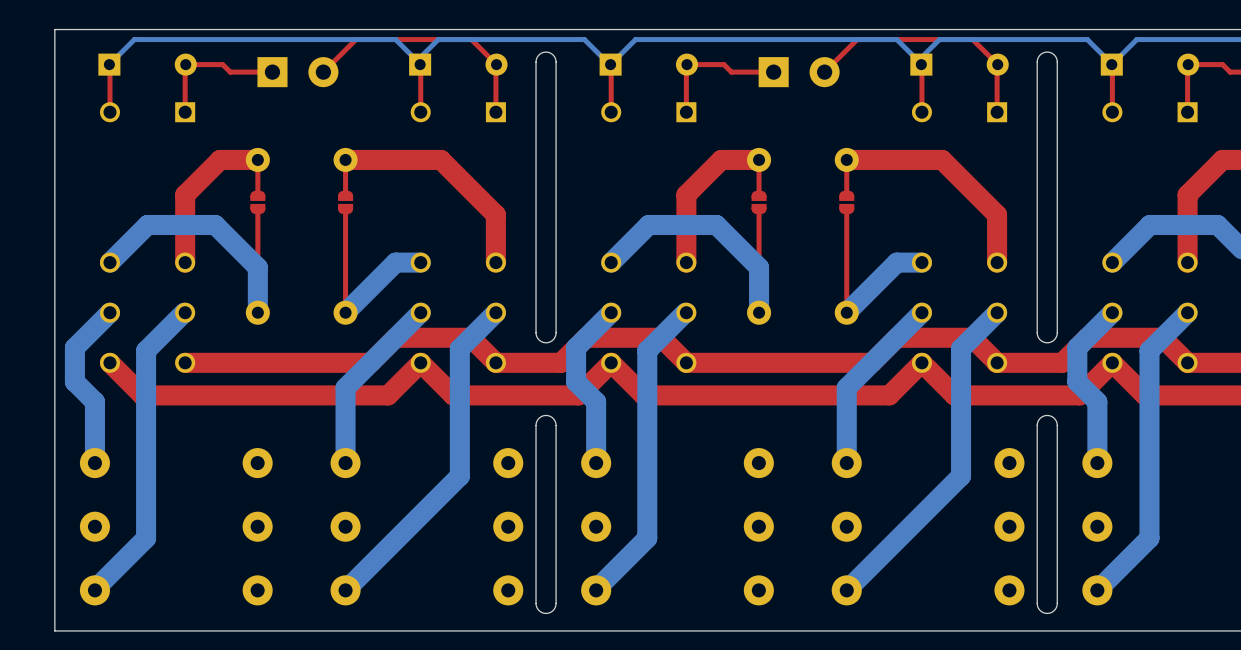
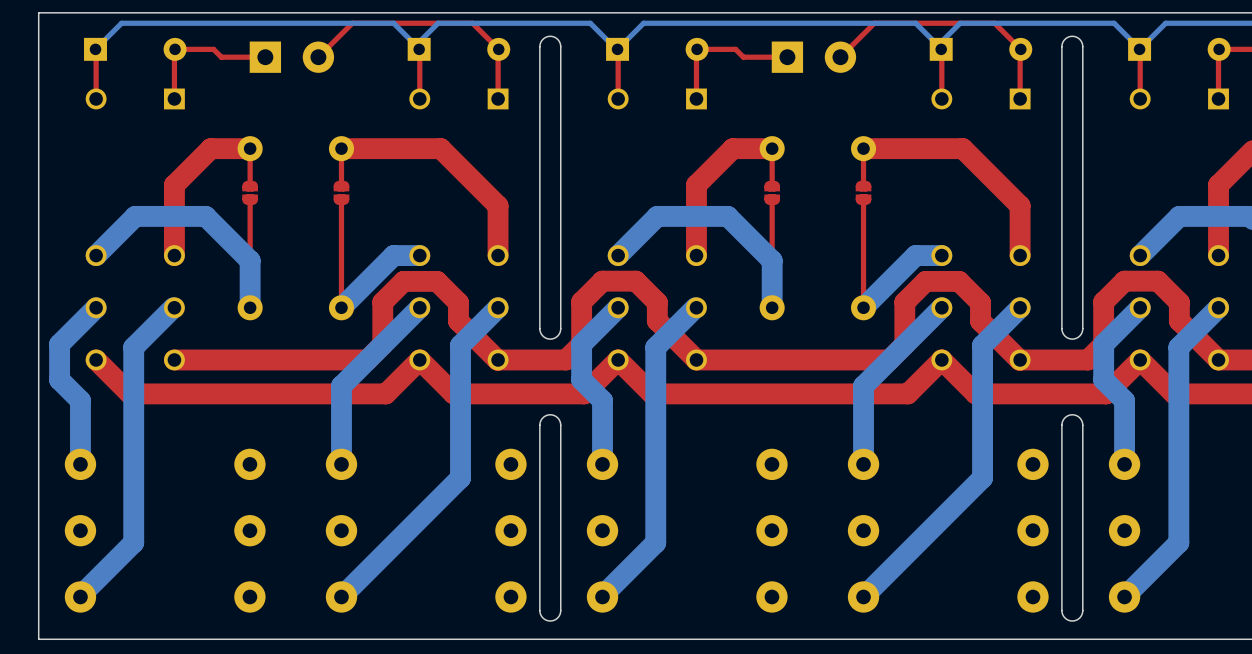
top track: (661, 337) (586, 337) (576, 347) -> (670, 333) (657, 320) (657, 302) (635, 281) (602, 281) (581, 302) (581, 344)
top track: (1162, 337) (1087, 337) (1077, 347) -> (1192, 333) (1179, 320) (1179, 302) (1157, 281) (1124, 281) (1103, 302) (1103, 344)
top track: (495, 362) (470, 337) (395, 337) (369, 362) -> (497, 359) (458, 321) (458, 302) (437, 281) (403, 281) (382, 302) (382, 344) (366, 359)
top track: (997, 362) (972, 337) (896, 337) (871, 362) -> (1019, 359) (980, 321) (980, 302) (959, 281) (925, 281) (904, 302) (904, 344) (888, 359)

